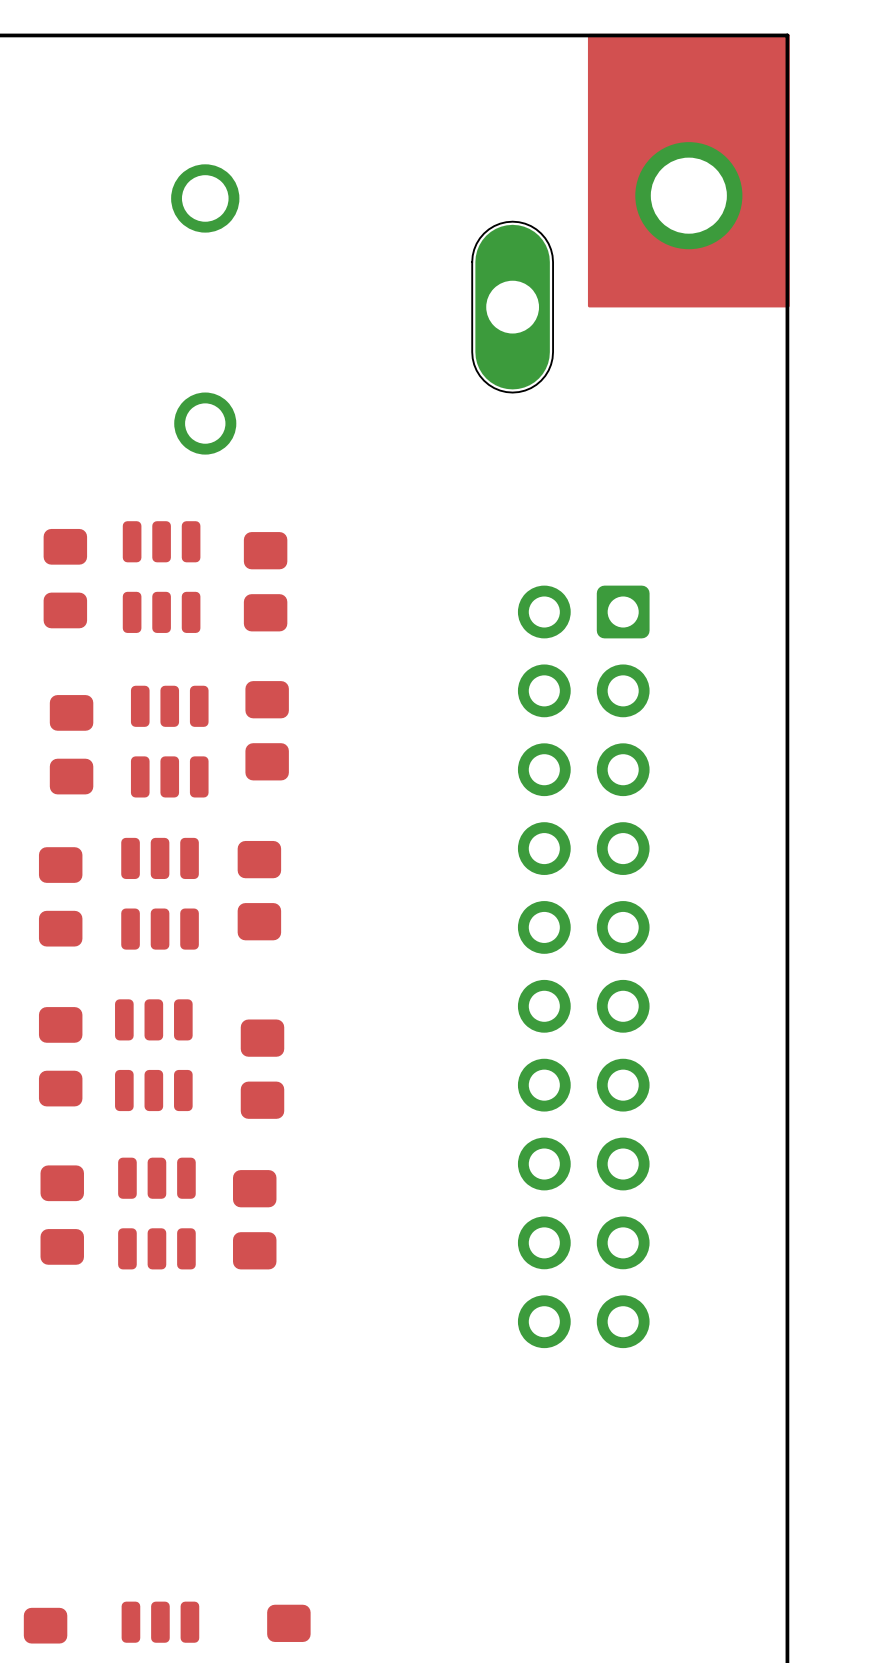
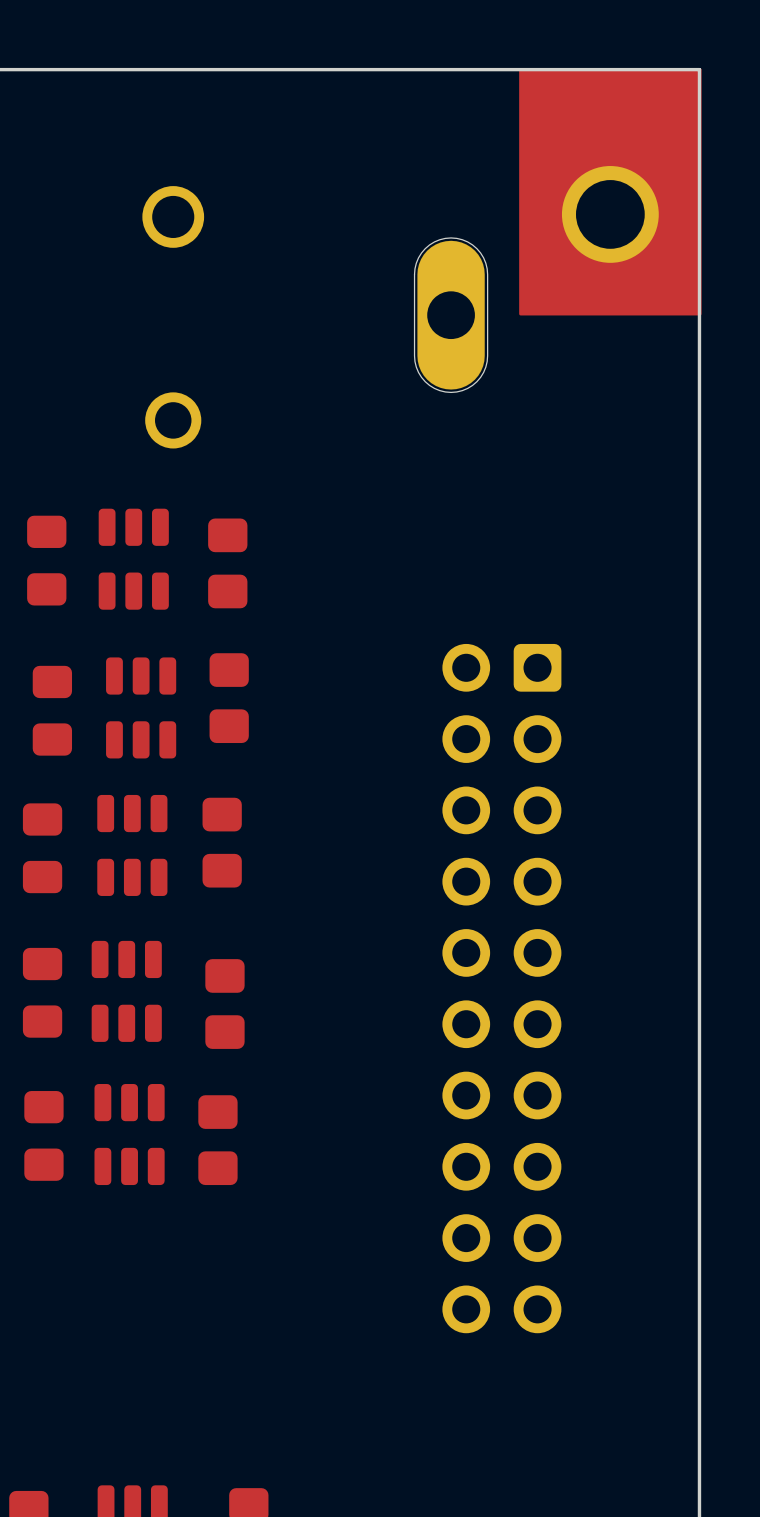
part position: (583, 966) -> (501, 988)

